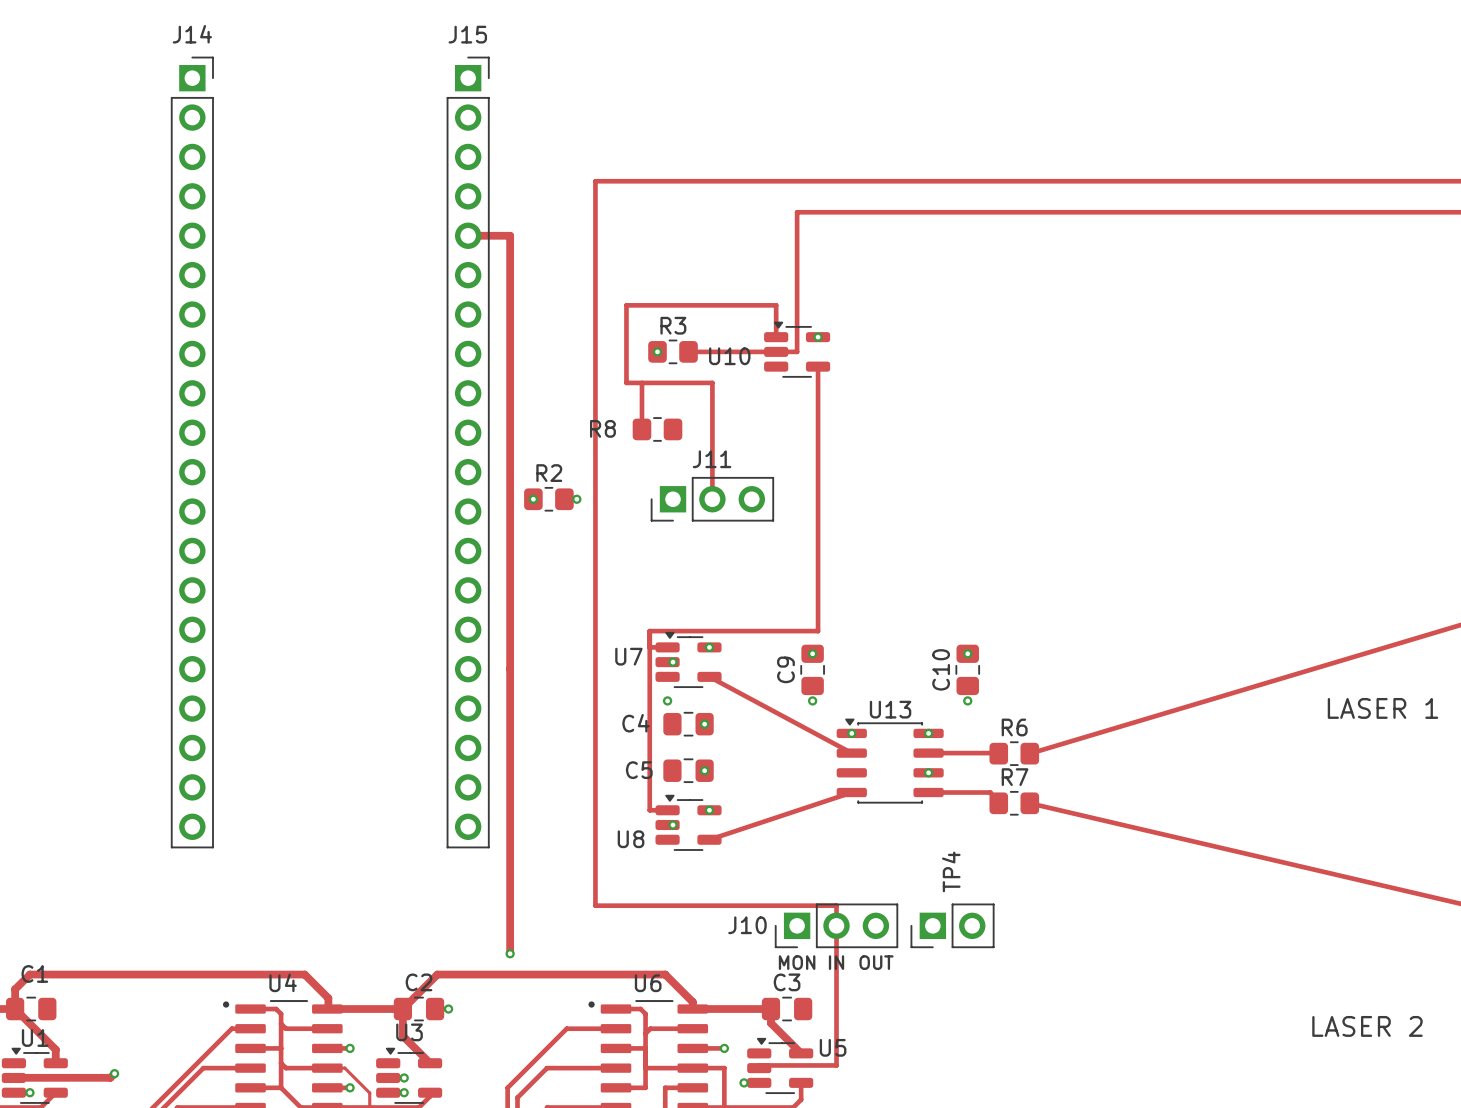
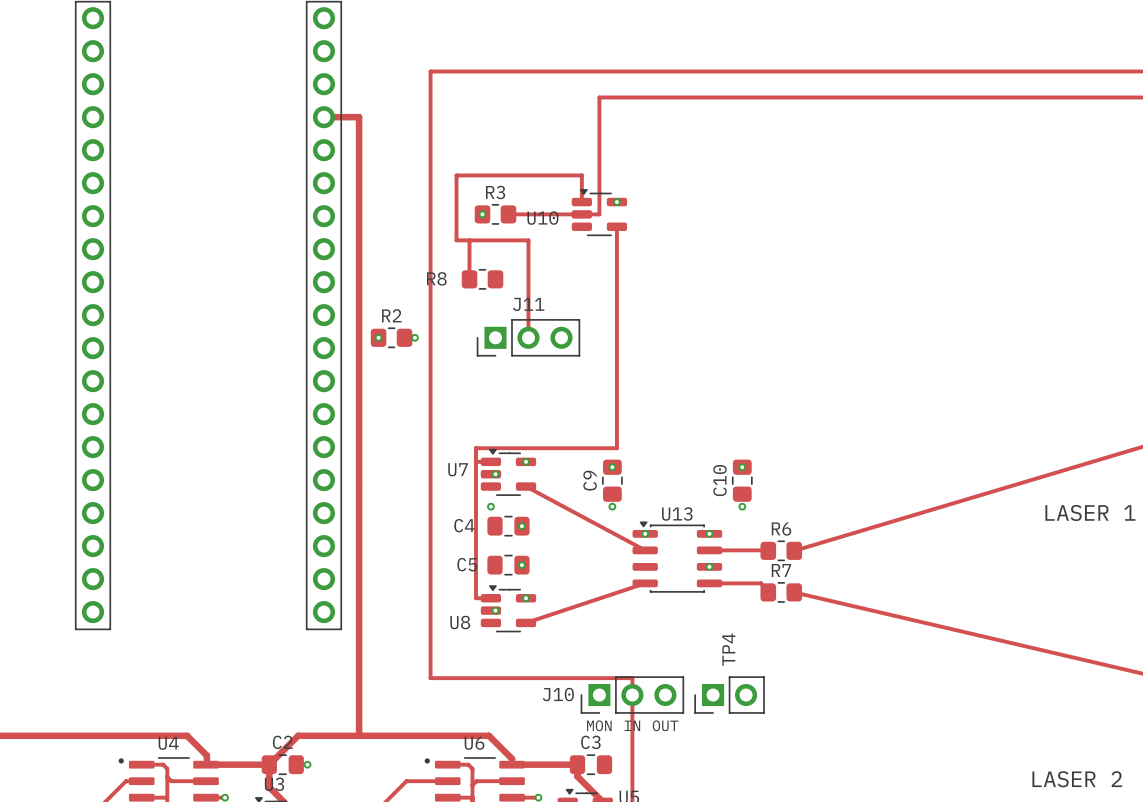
track: none -> (359, 718) (359, 735)
via: (510, 953) -> none

